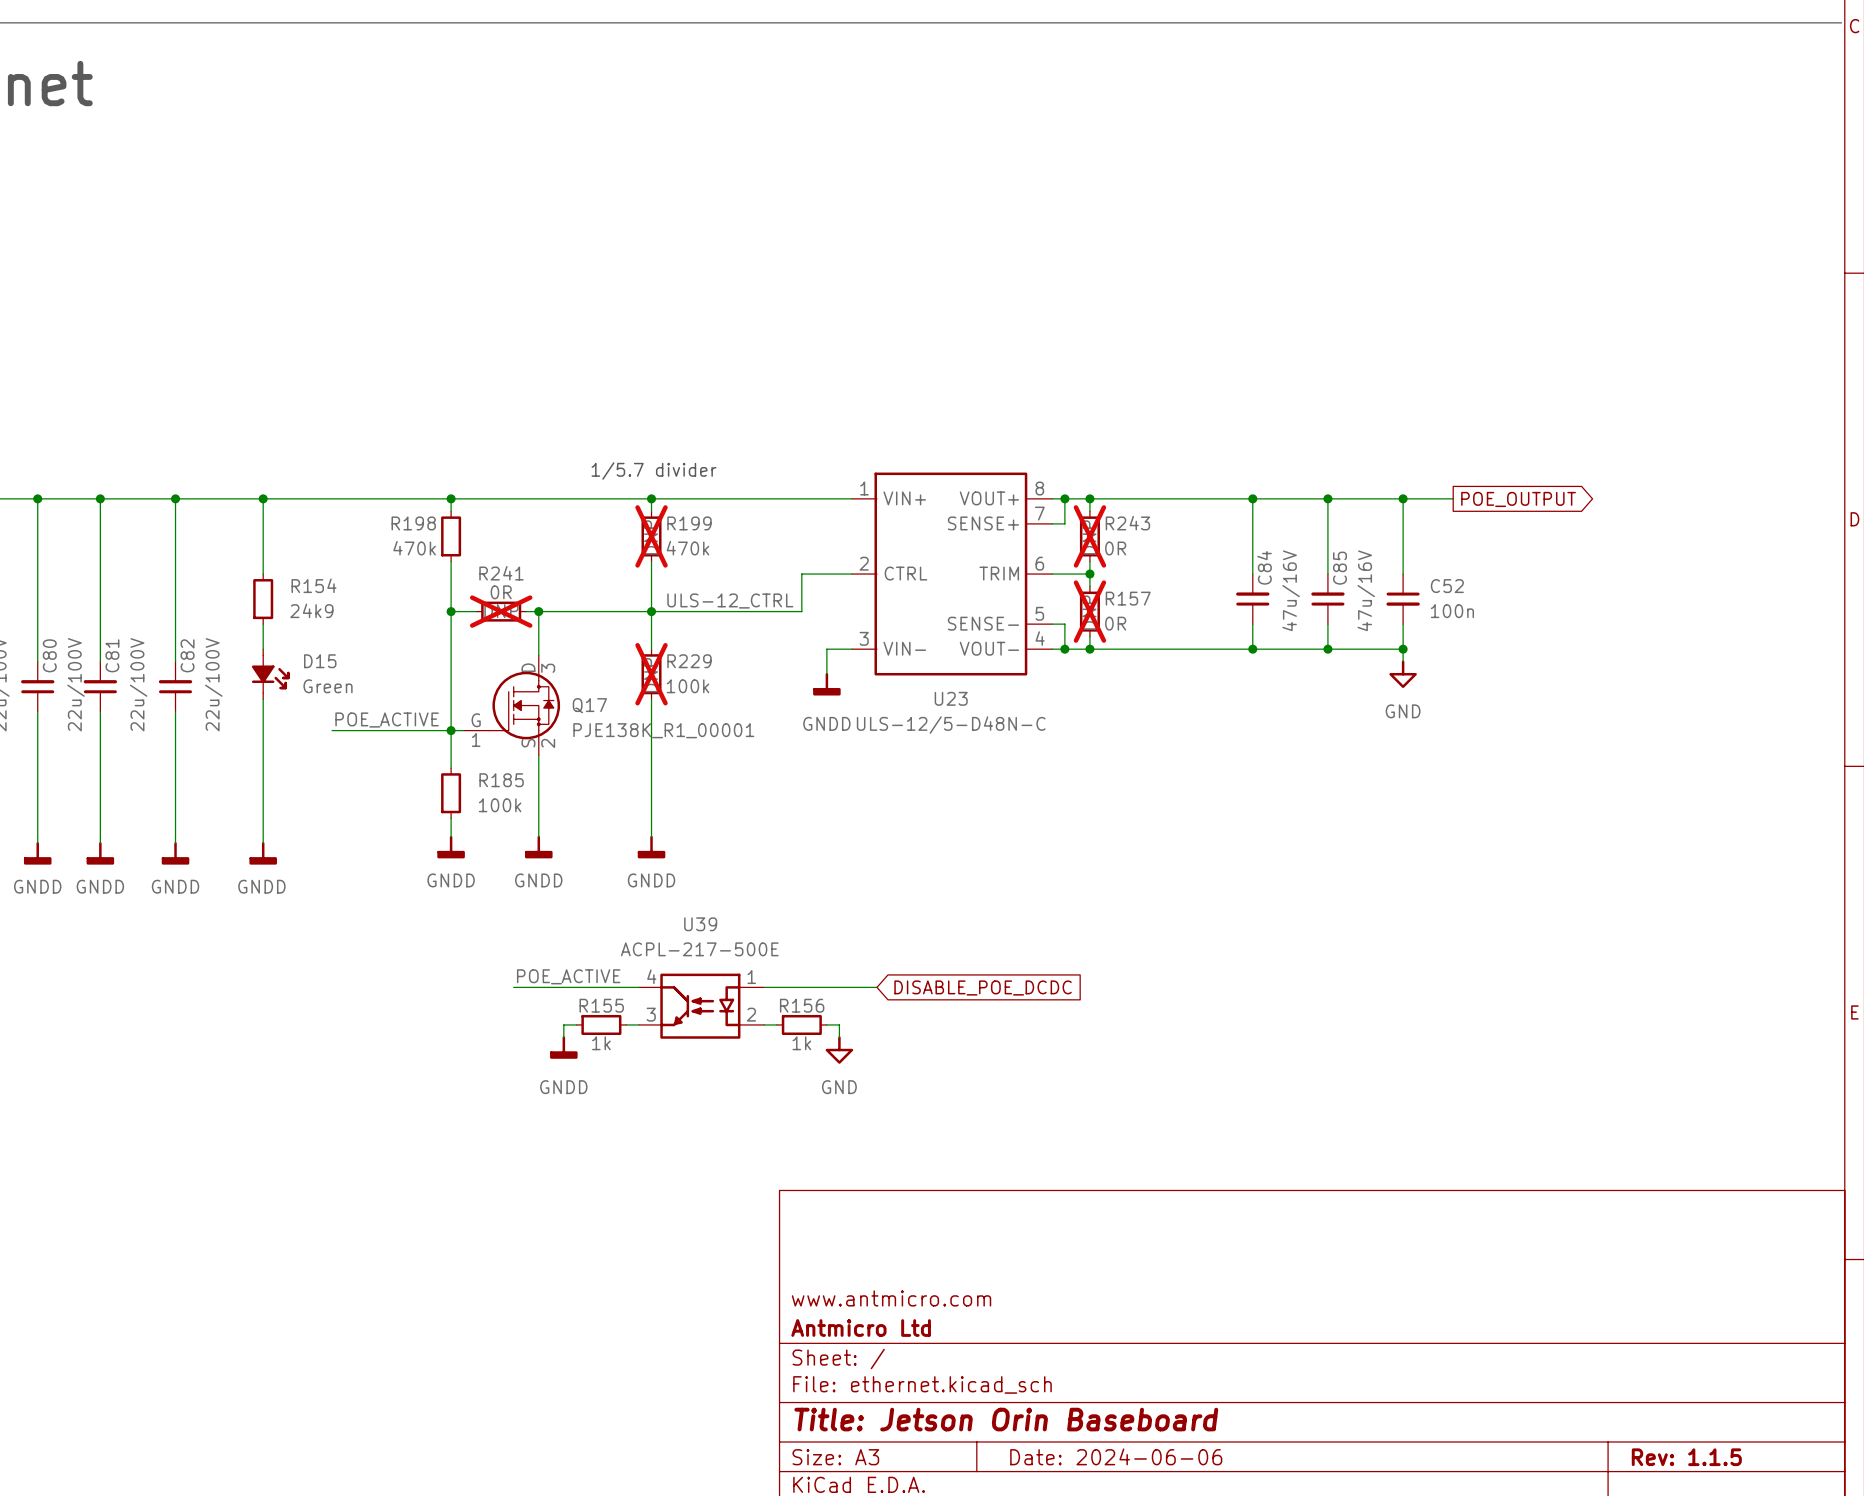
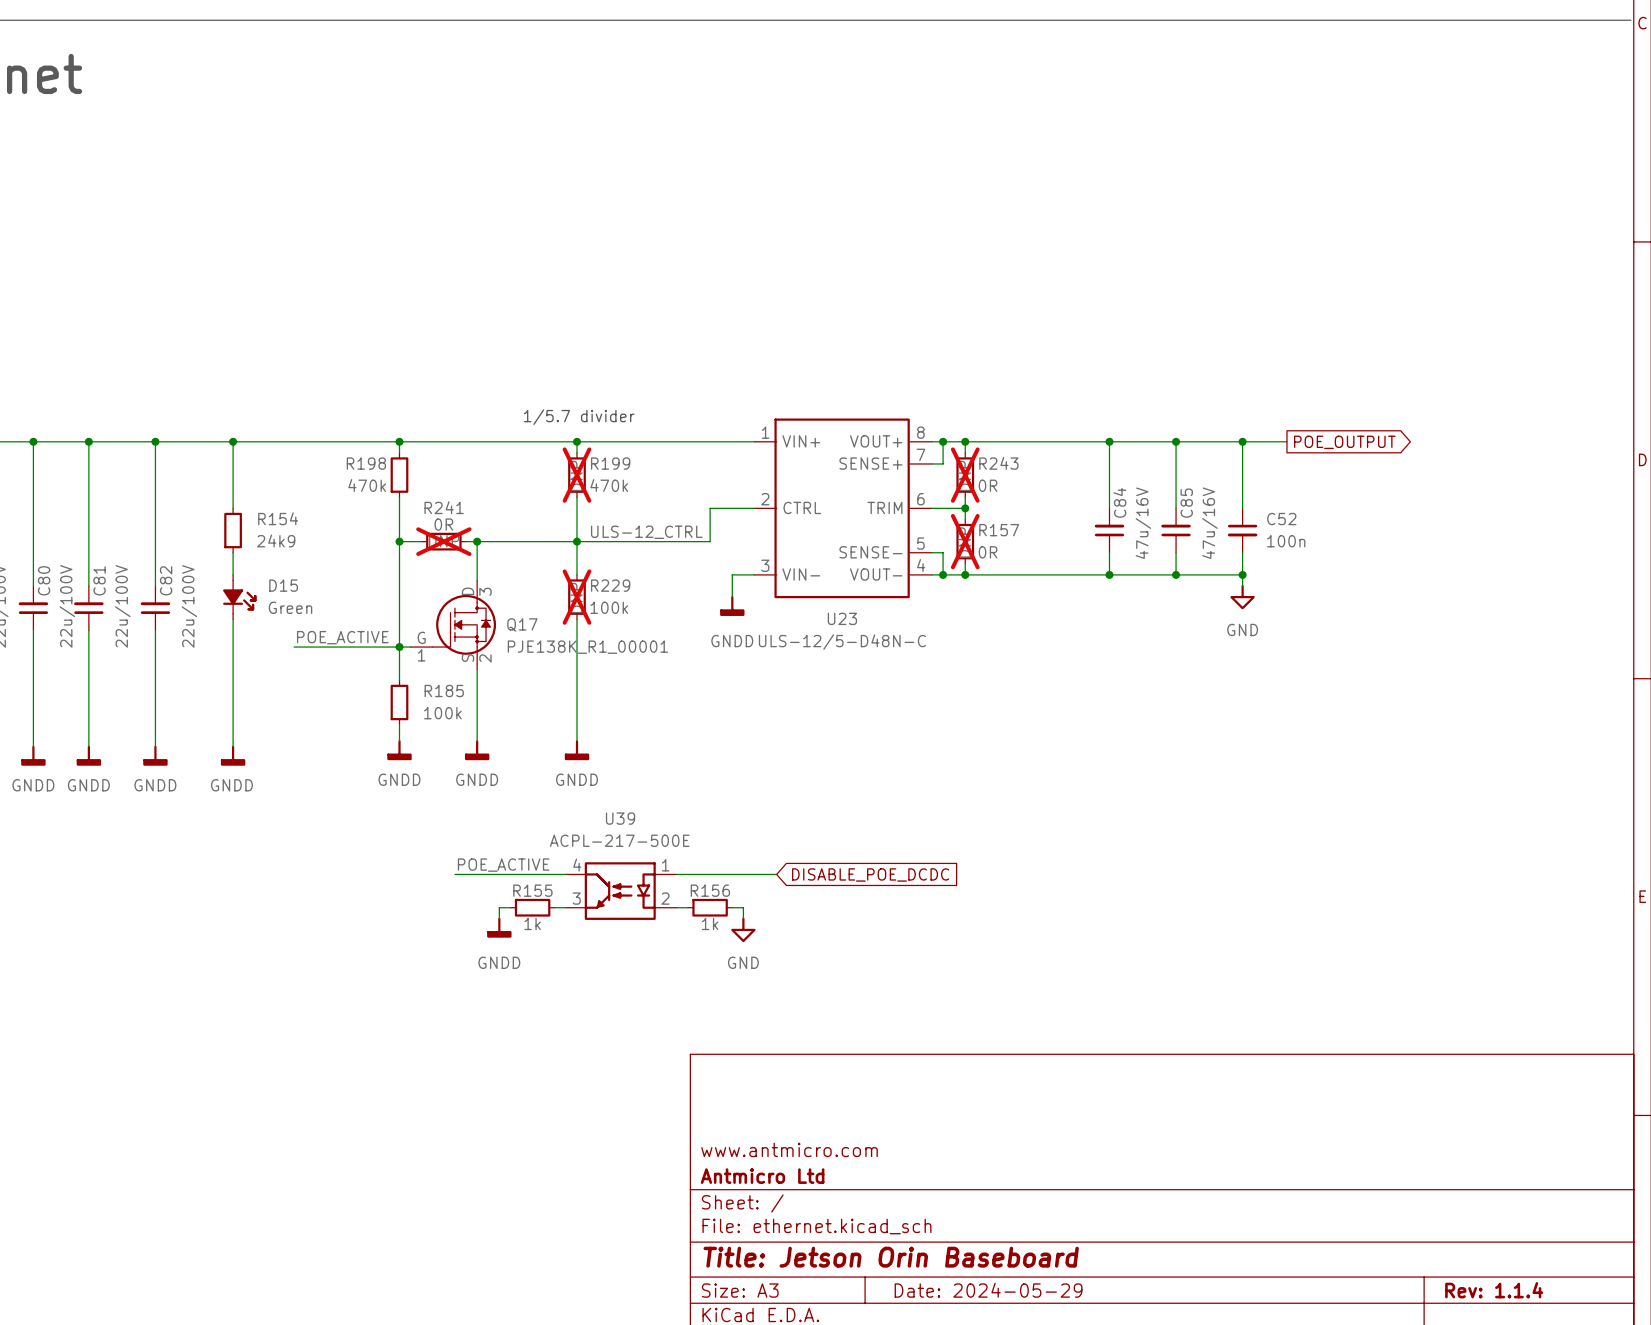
title block: Date: 2024-06-06 (1116, 1456) -> Date: 2024-05-29 (988, 1290)
title block: Rev: 1.1.5 (1686, 1457) -> Rev: 1.1.4 (1494, 1290)

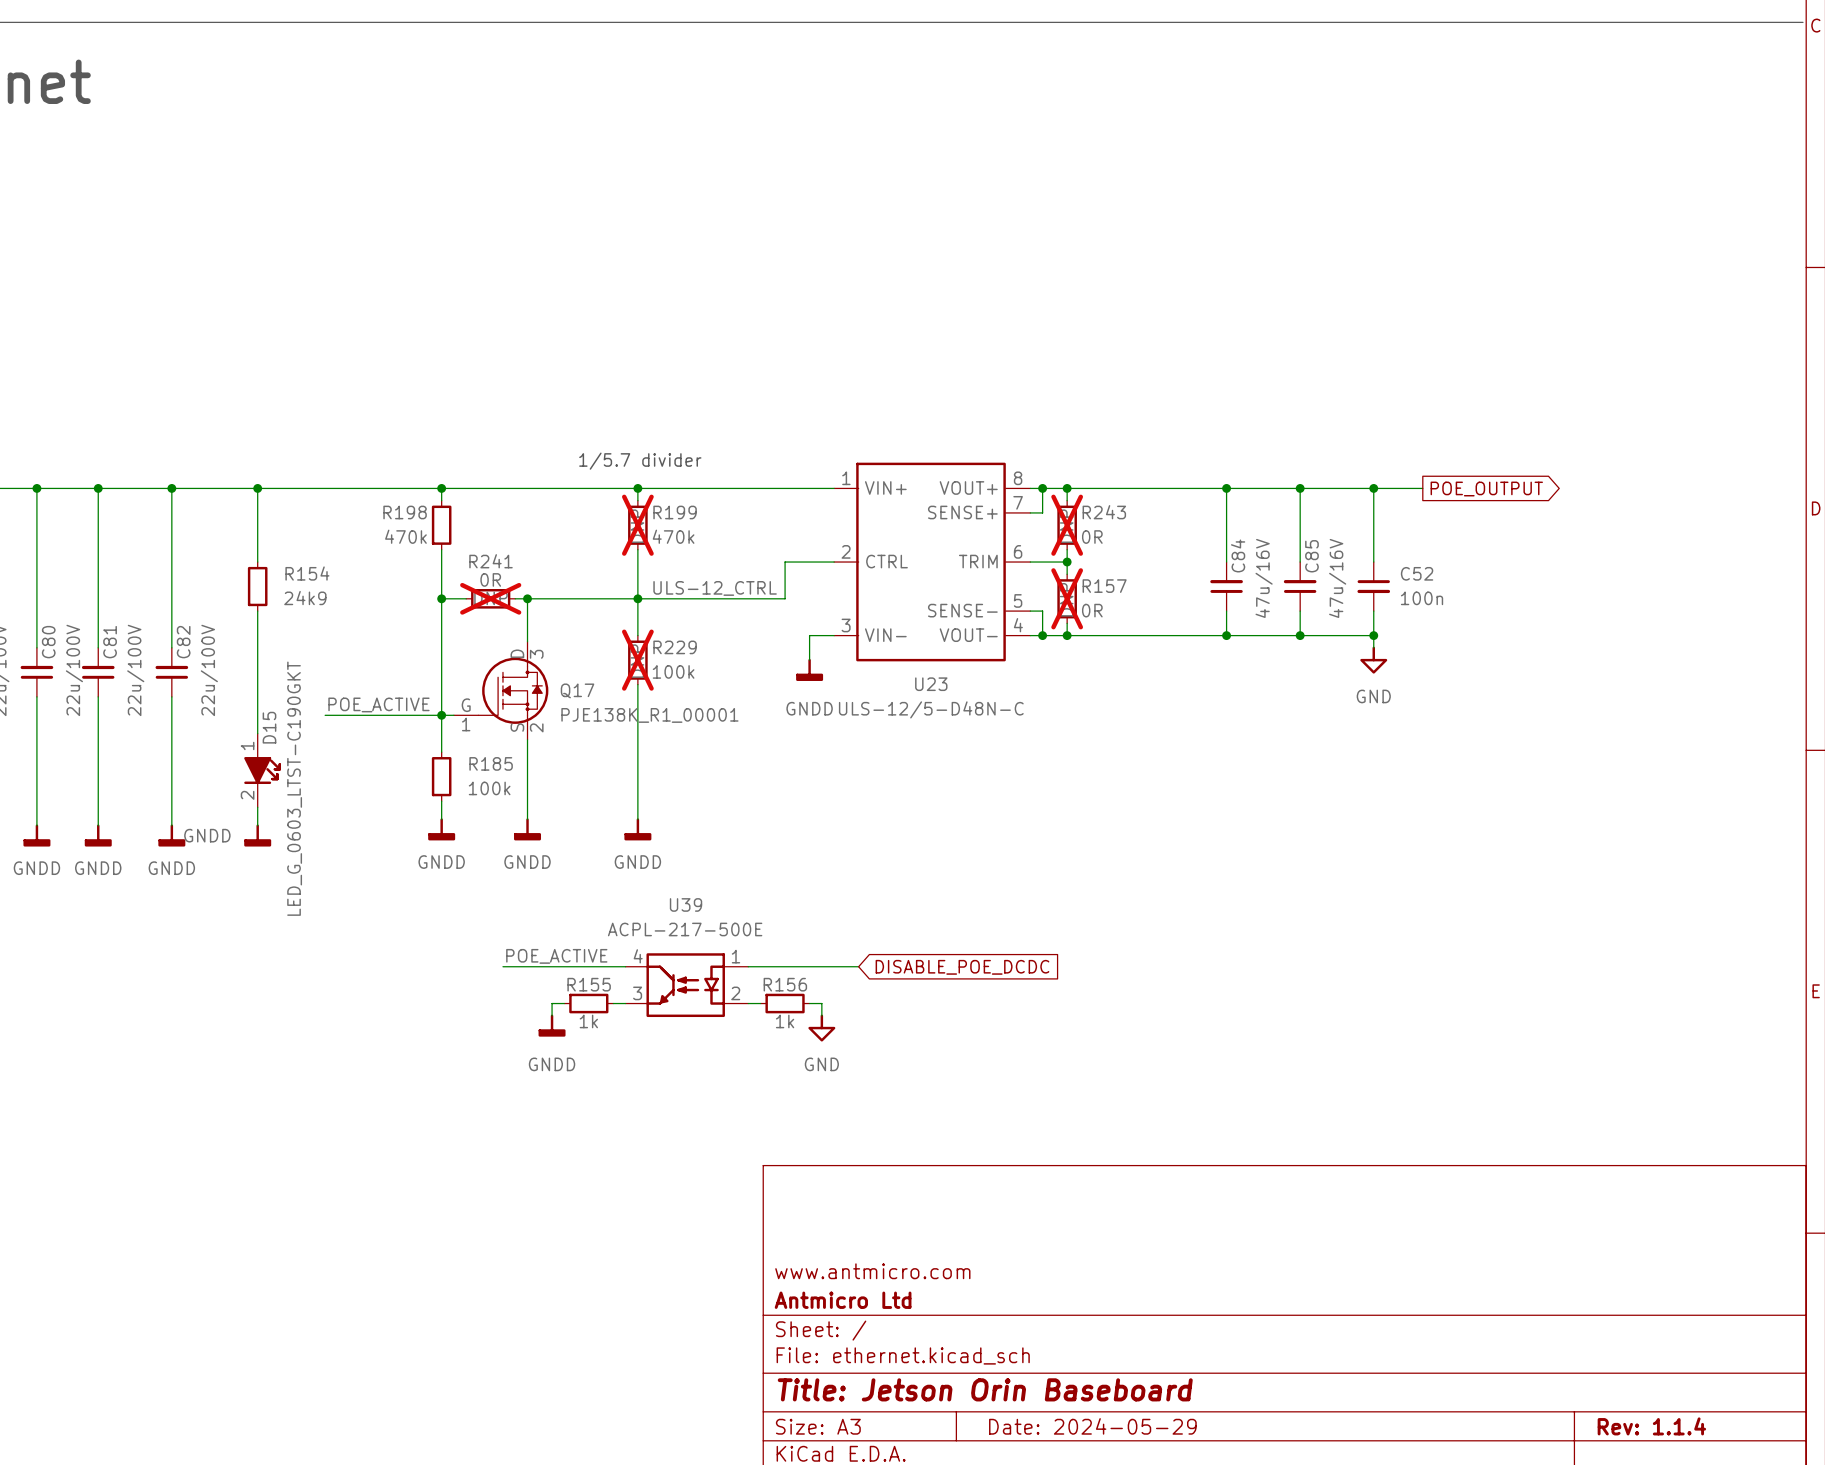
D15 symbol: [223, 574, 257, 620] -> [244, 733, 281, 808]
D15 name position: D15 (283, 585) -> D15 (269, 727)
D15 text: Green (290, 607) -> none
D15 value: none -> LED_G_0603_LTST-C190GKT (294, 788)
power symbol text position: GNDD (231, 785) -> GNDD (207, 835)

